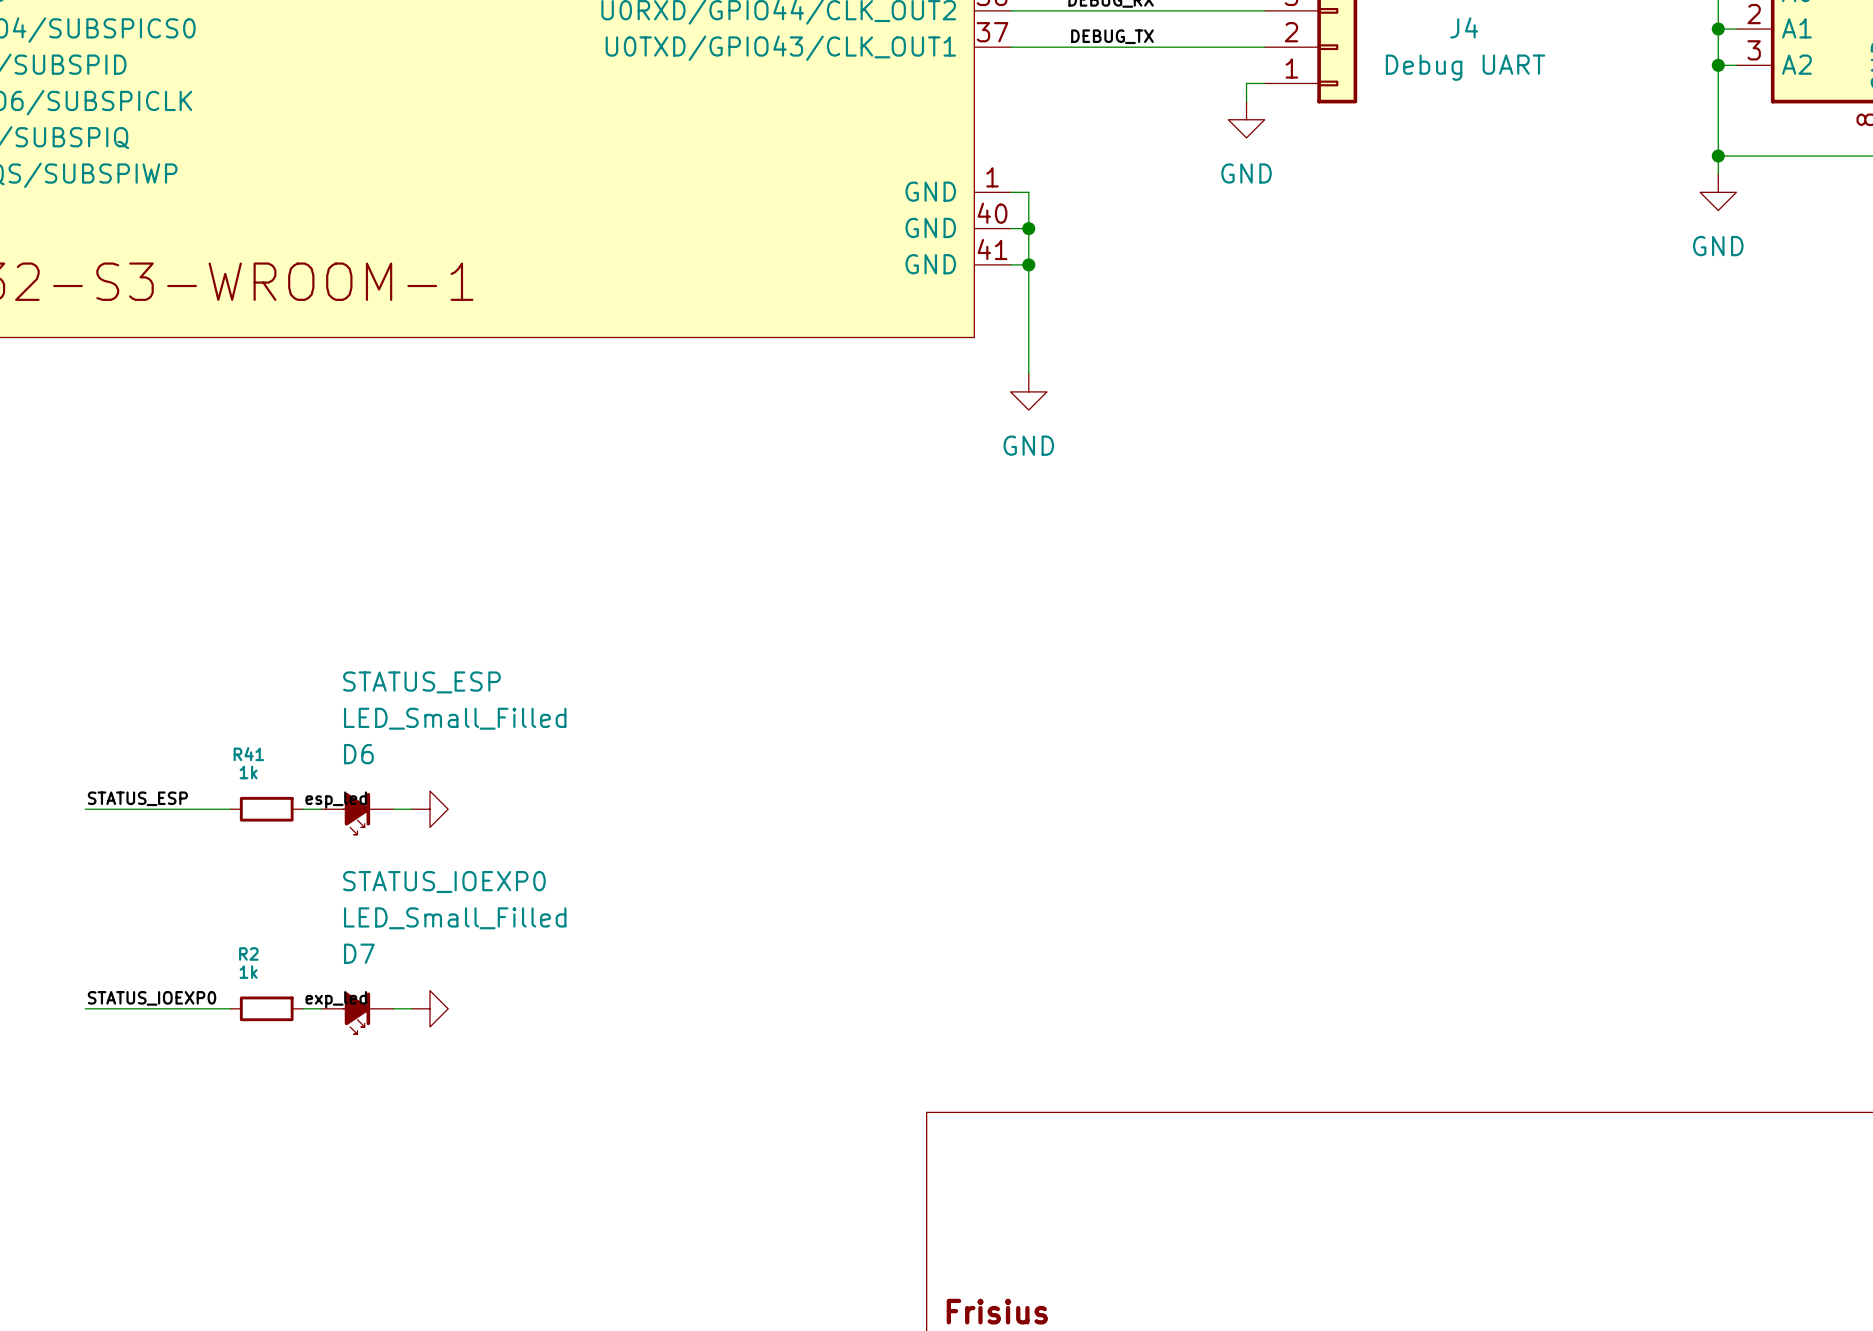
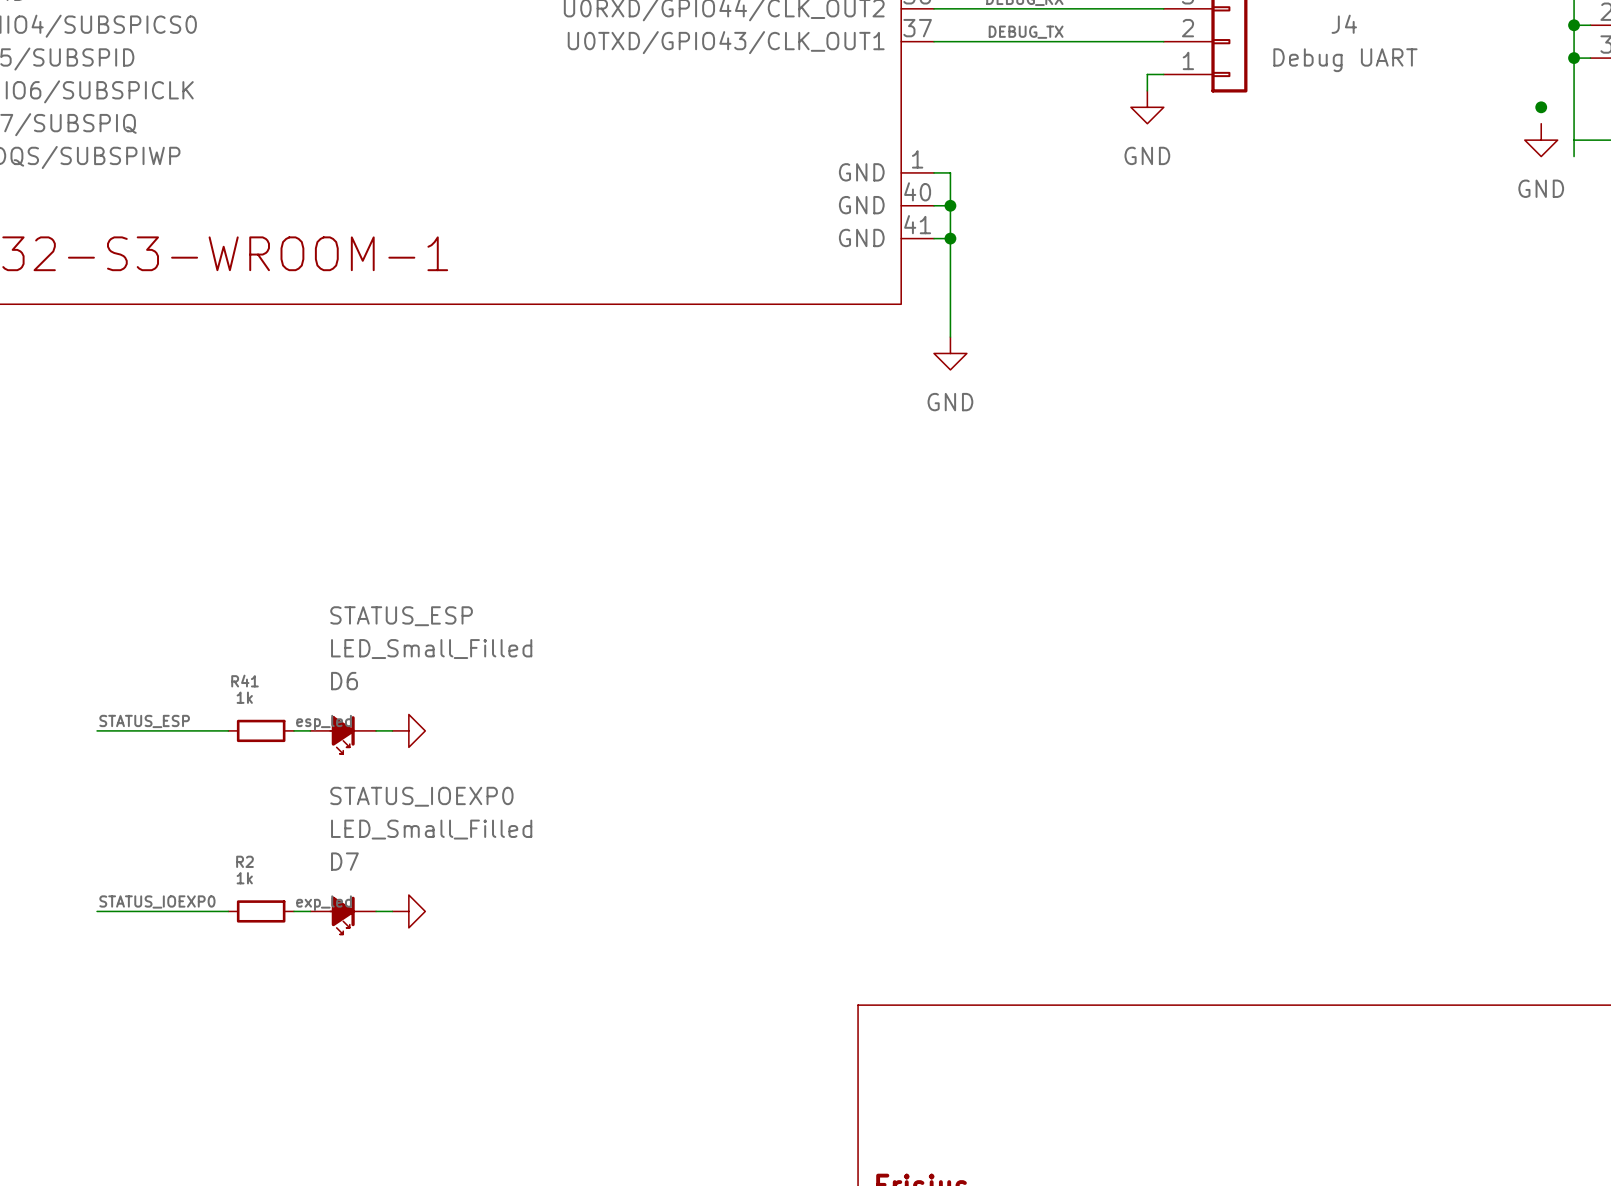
junction position: (1718, 156) -> (1541, 107)
power symbol position: GND (1718, 192) -> GND (1541, 140)

